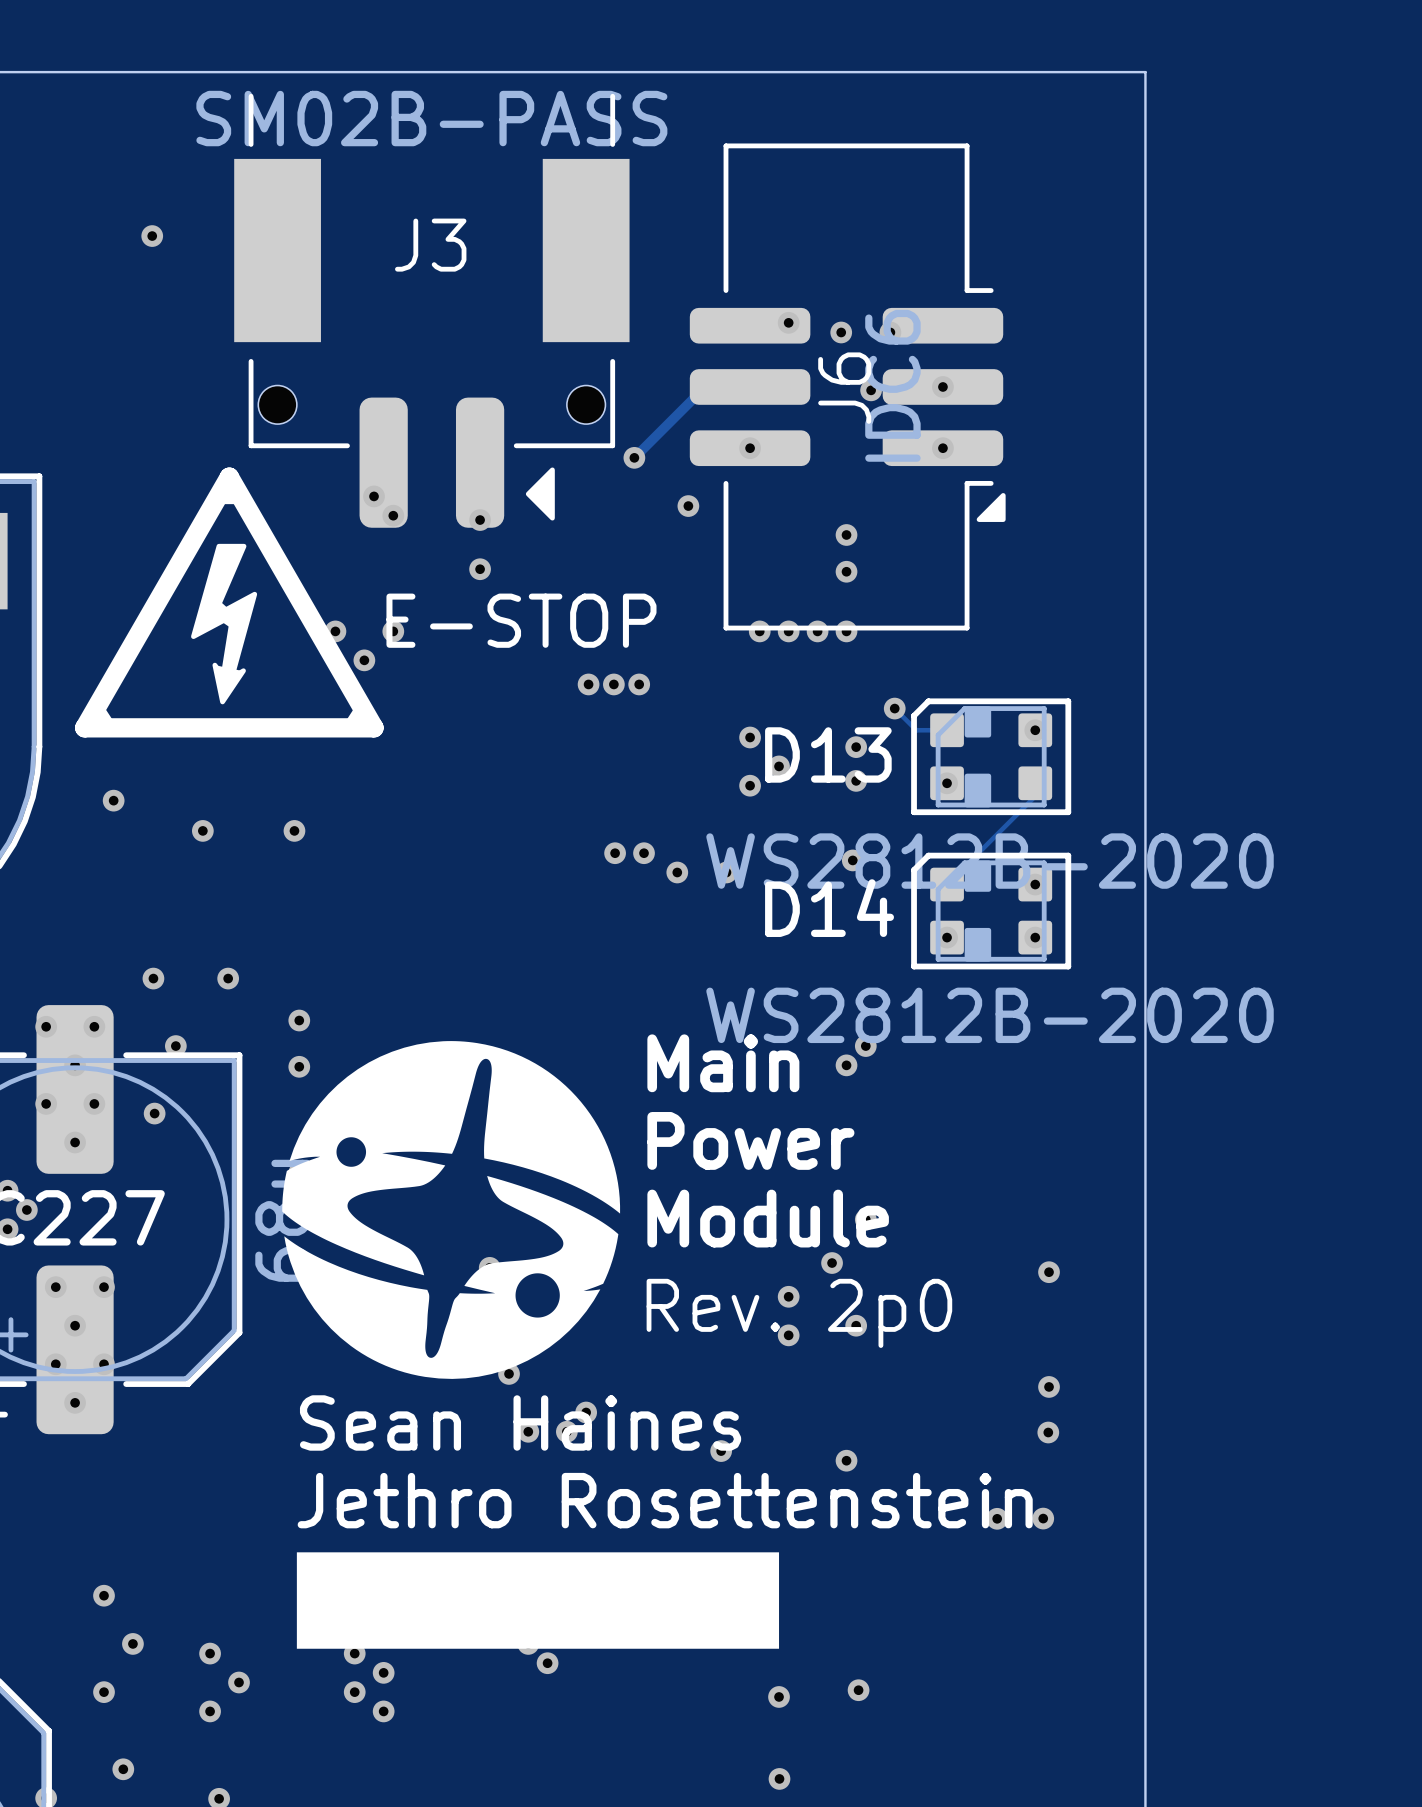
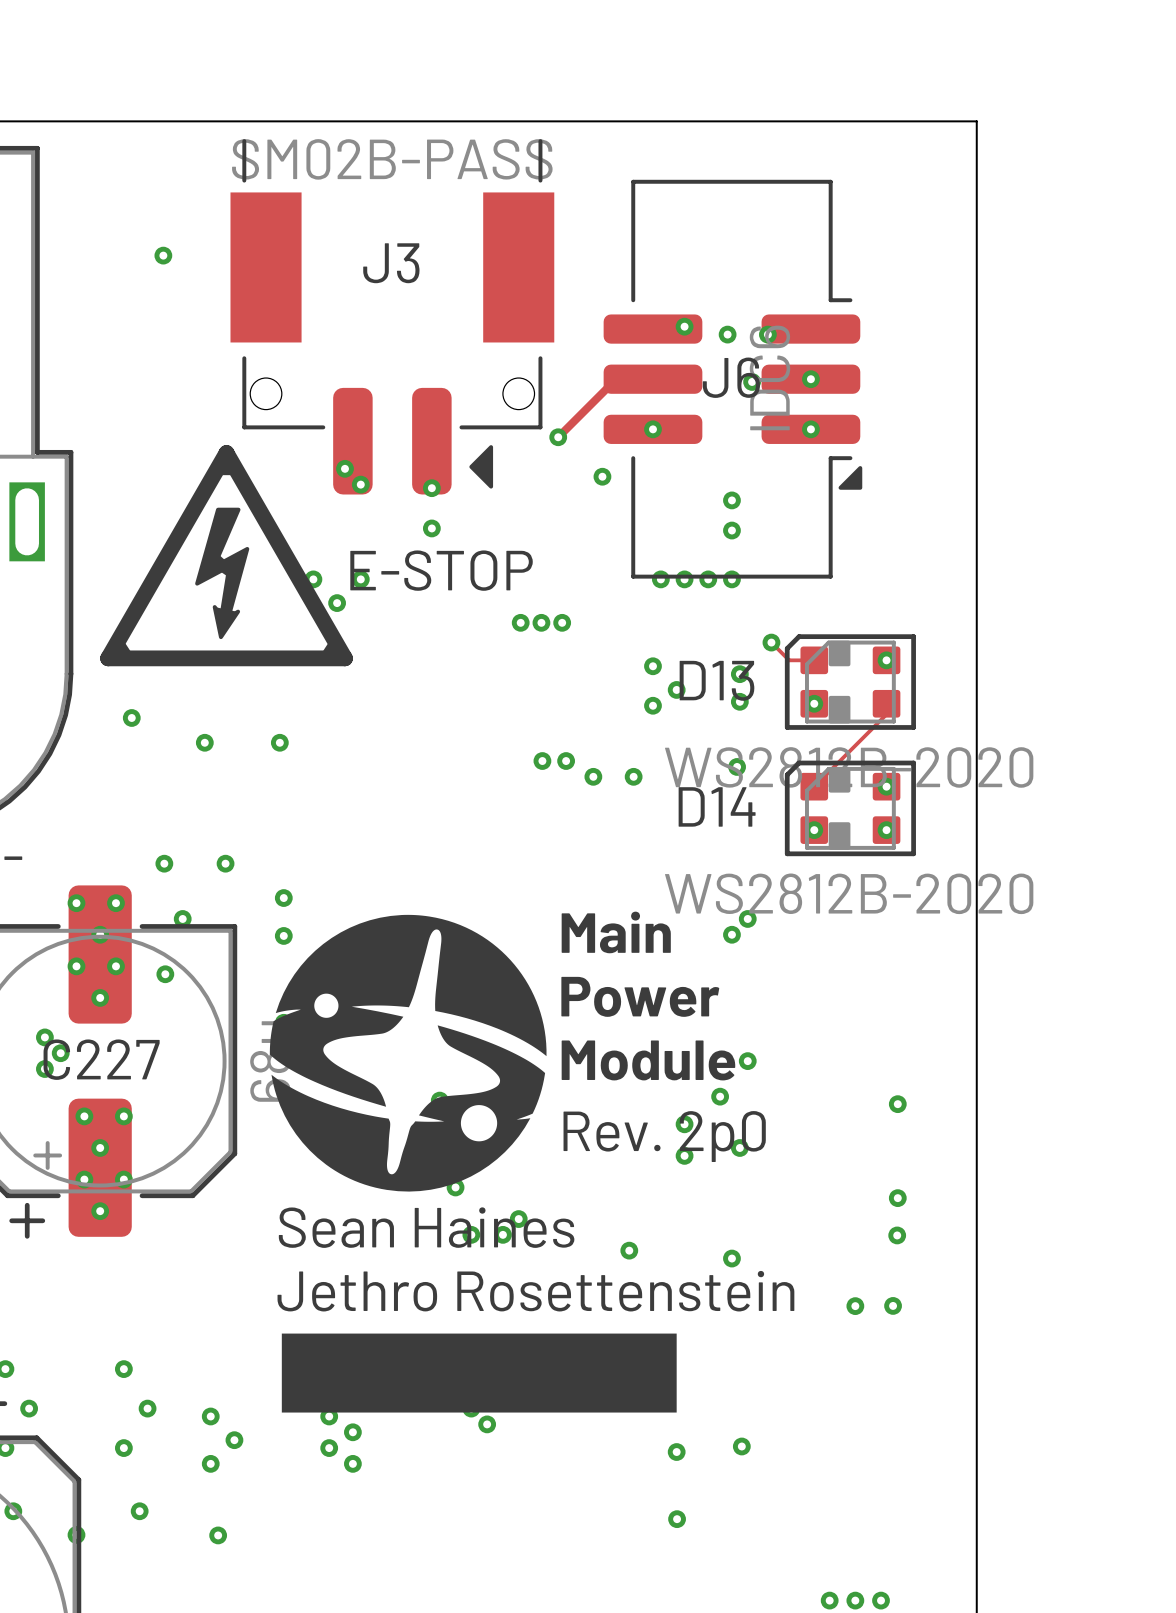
J6 name rotation: 0° (844, 388) -> 90° clockwise (731, 377)

